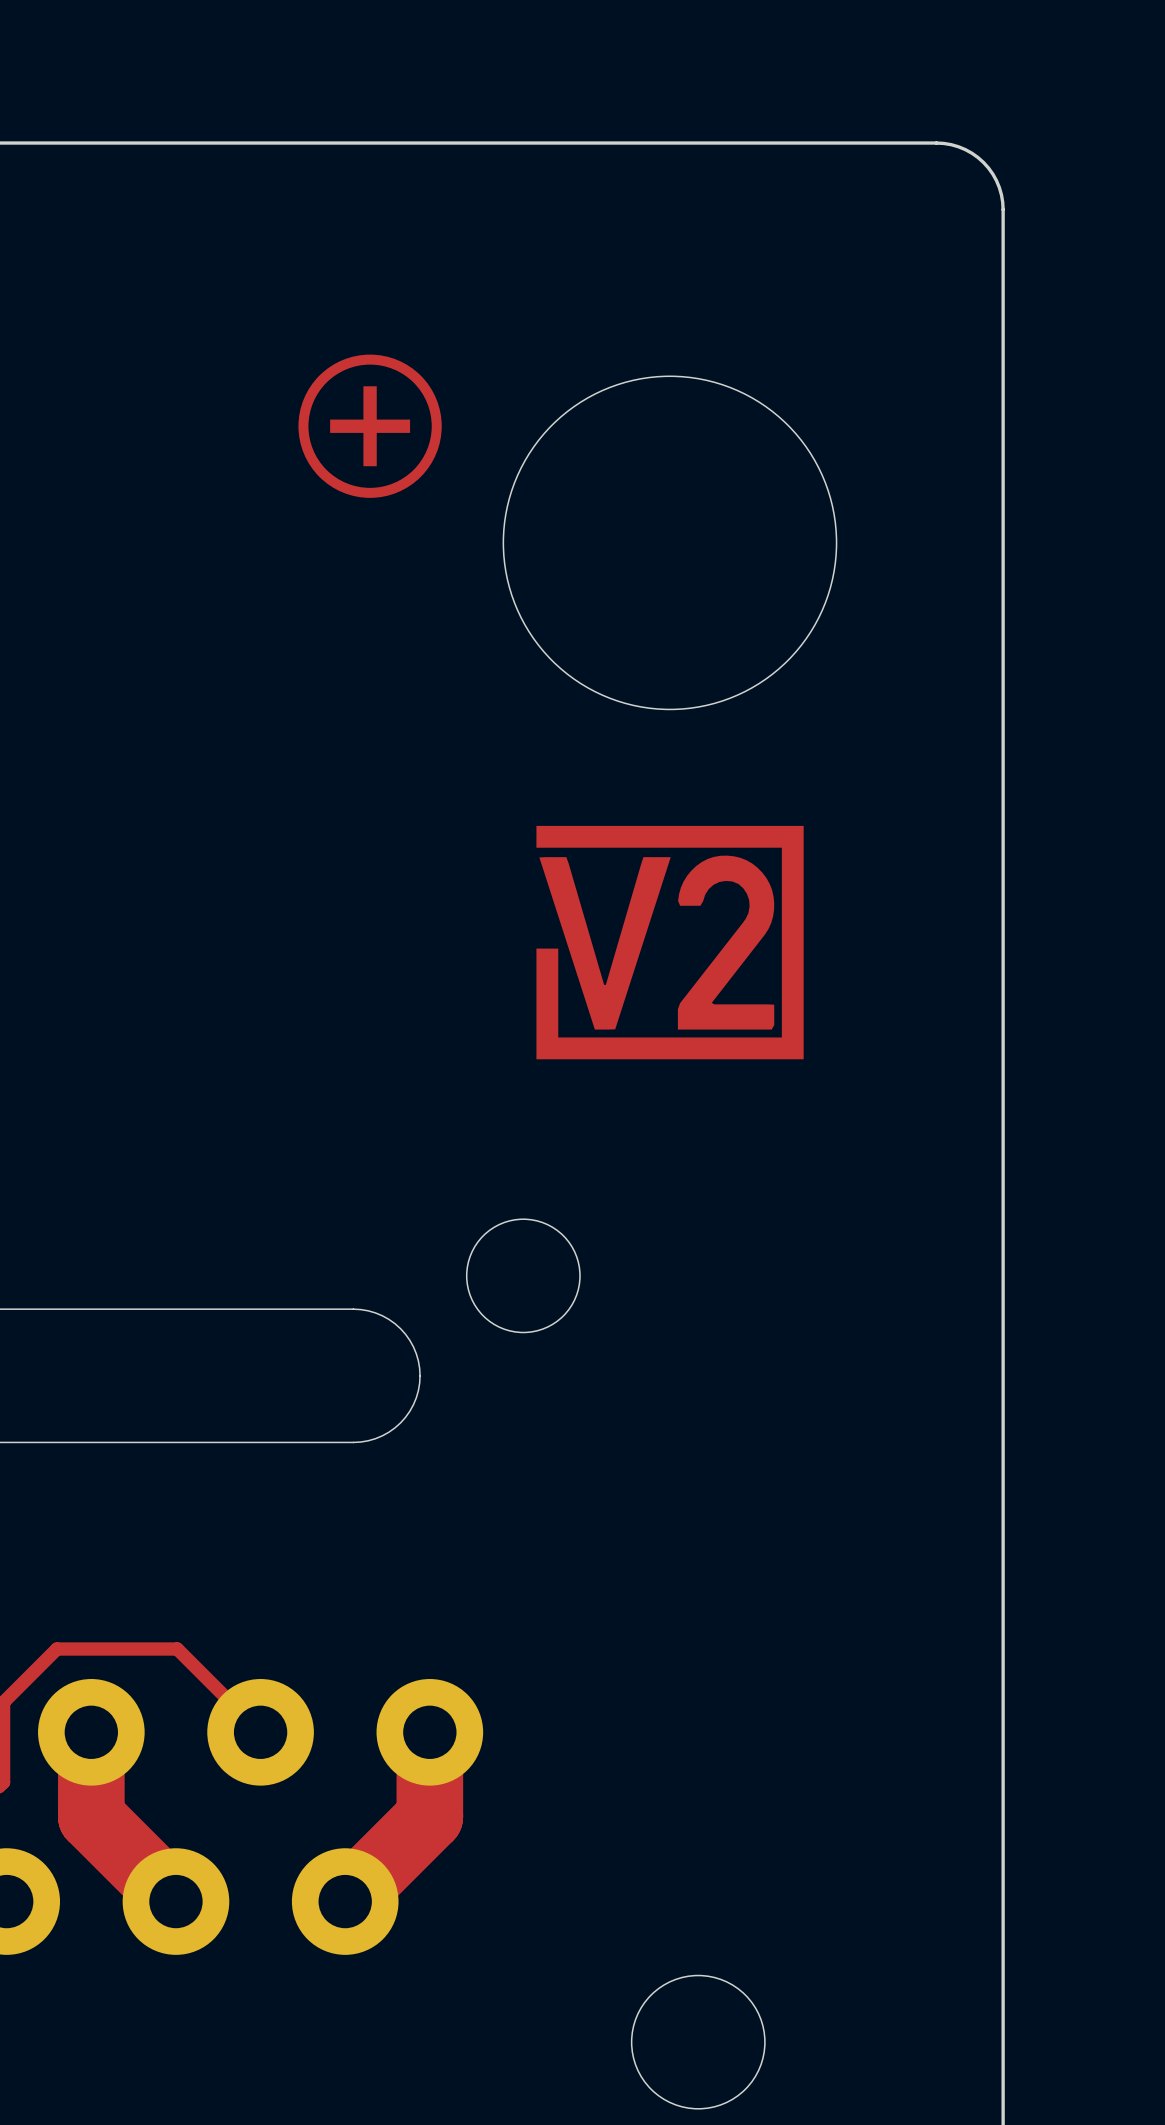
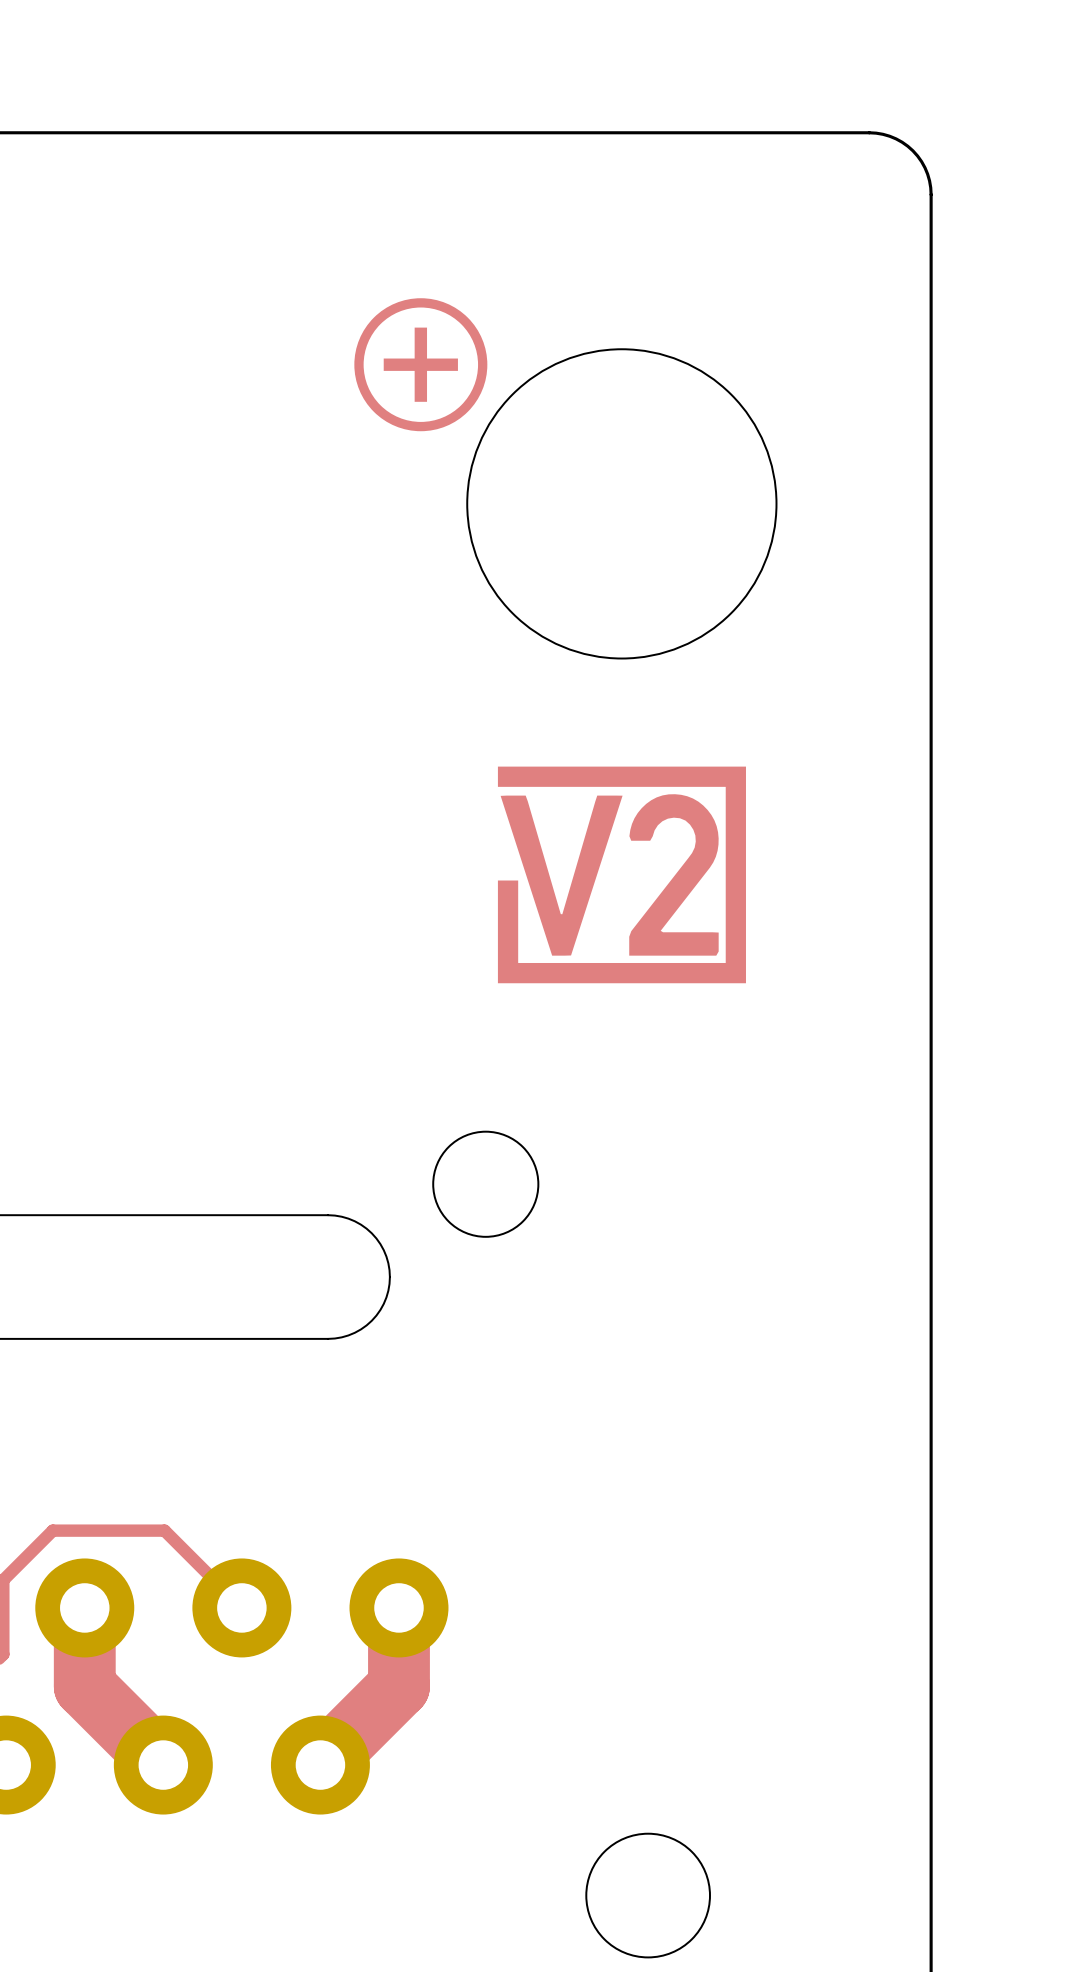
drawing position: (370, 426) -> (420, 364)

